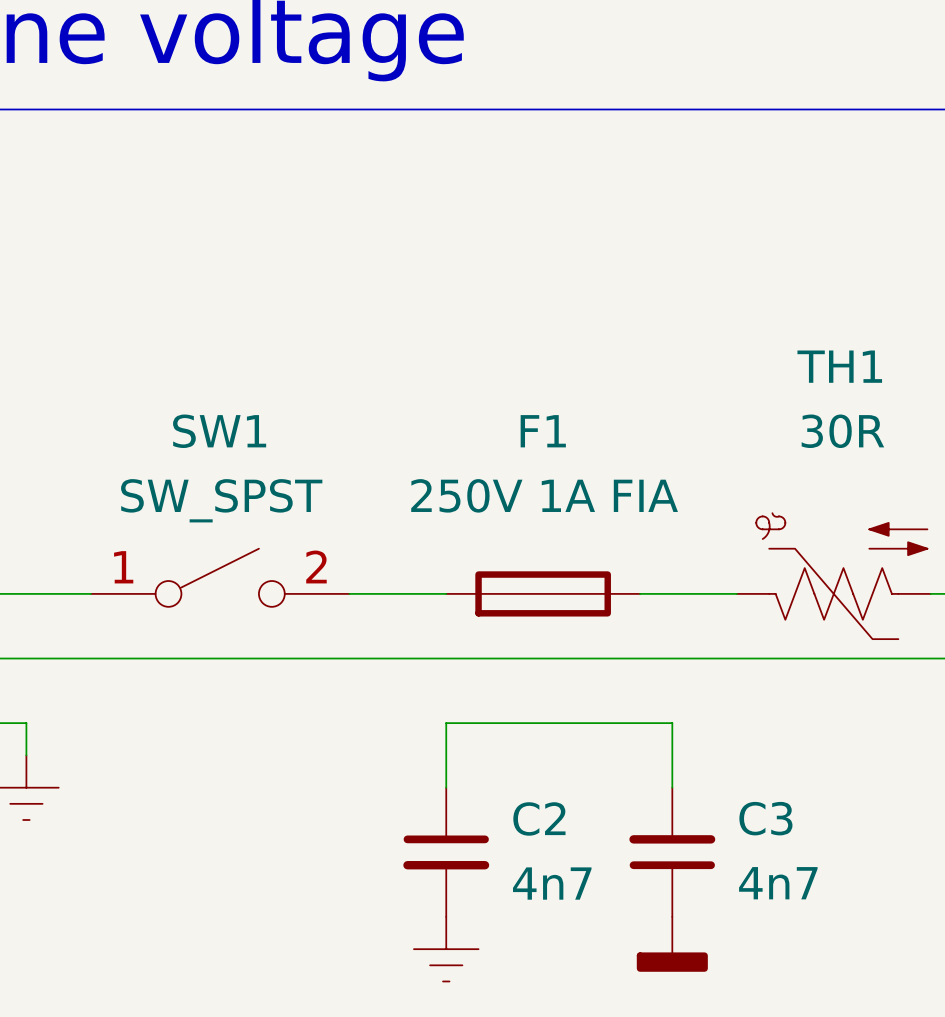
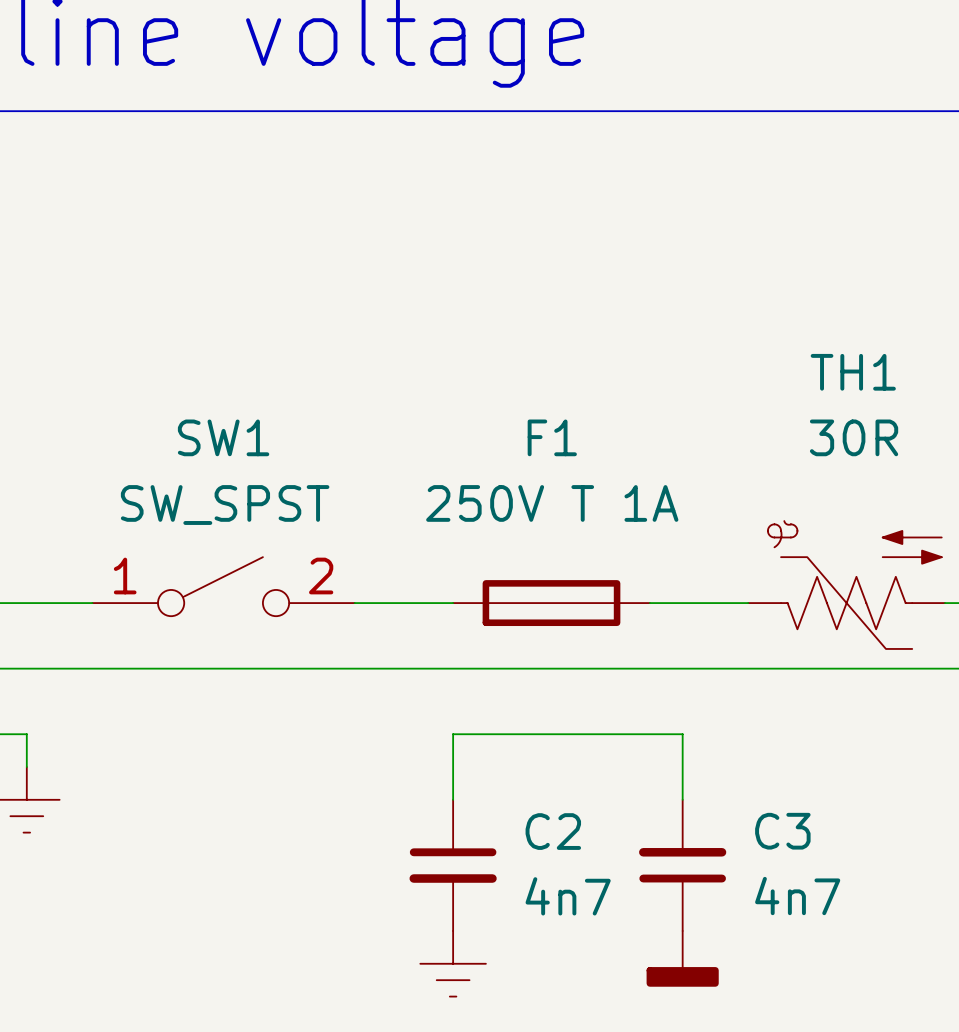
F1 value: 250V 1A FIA (544, 495) -> 250V T 1A (552, 503)

